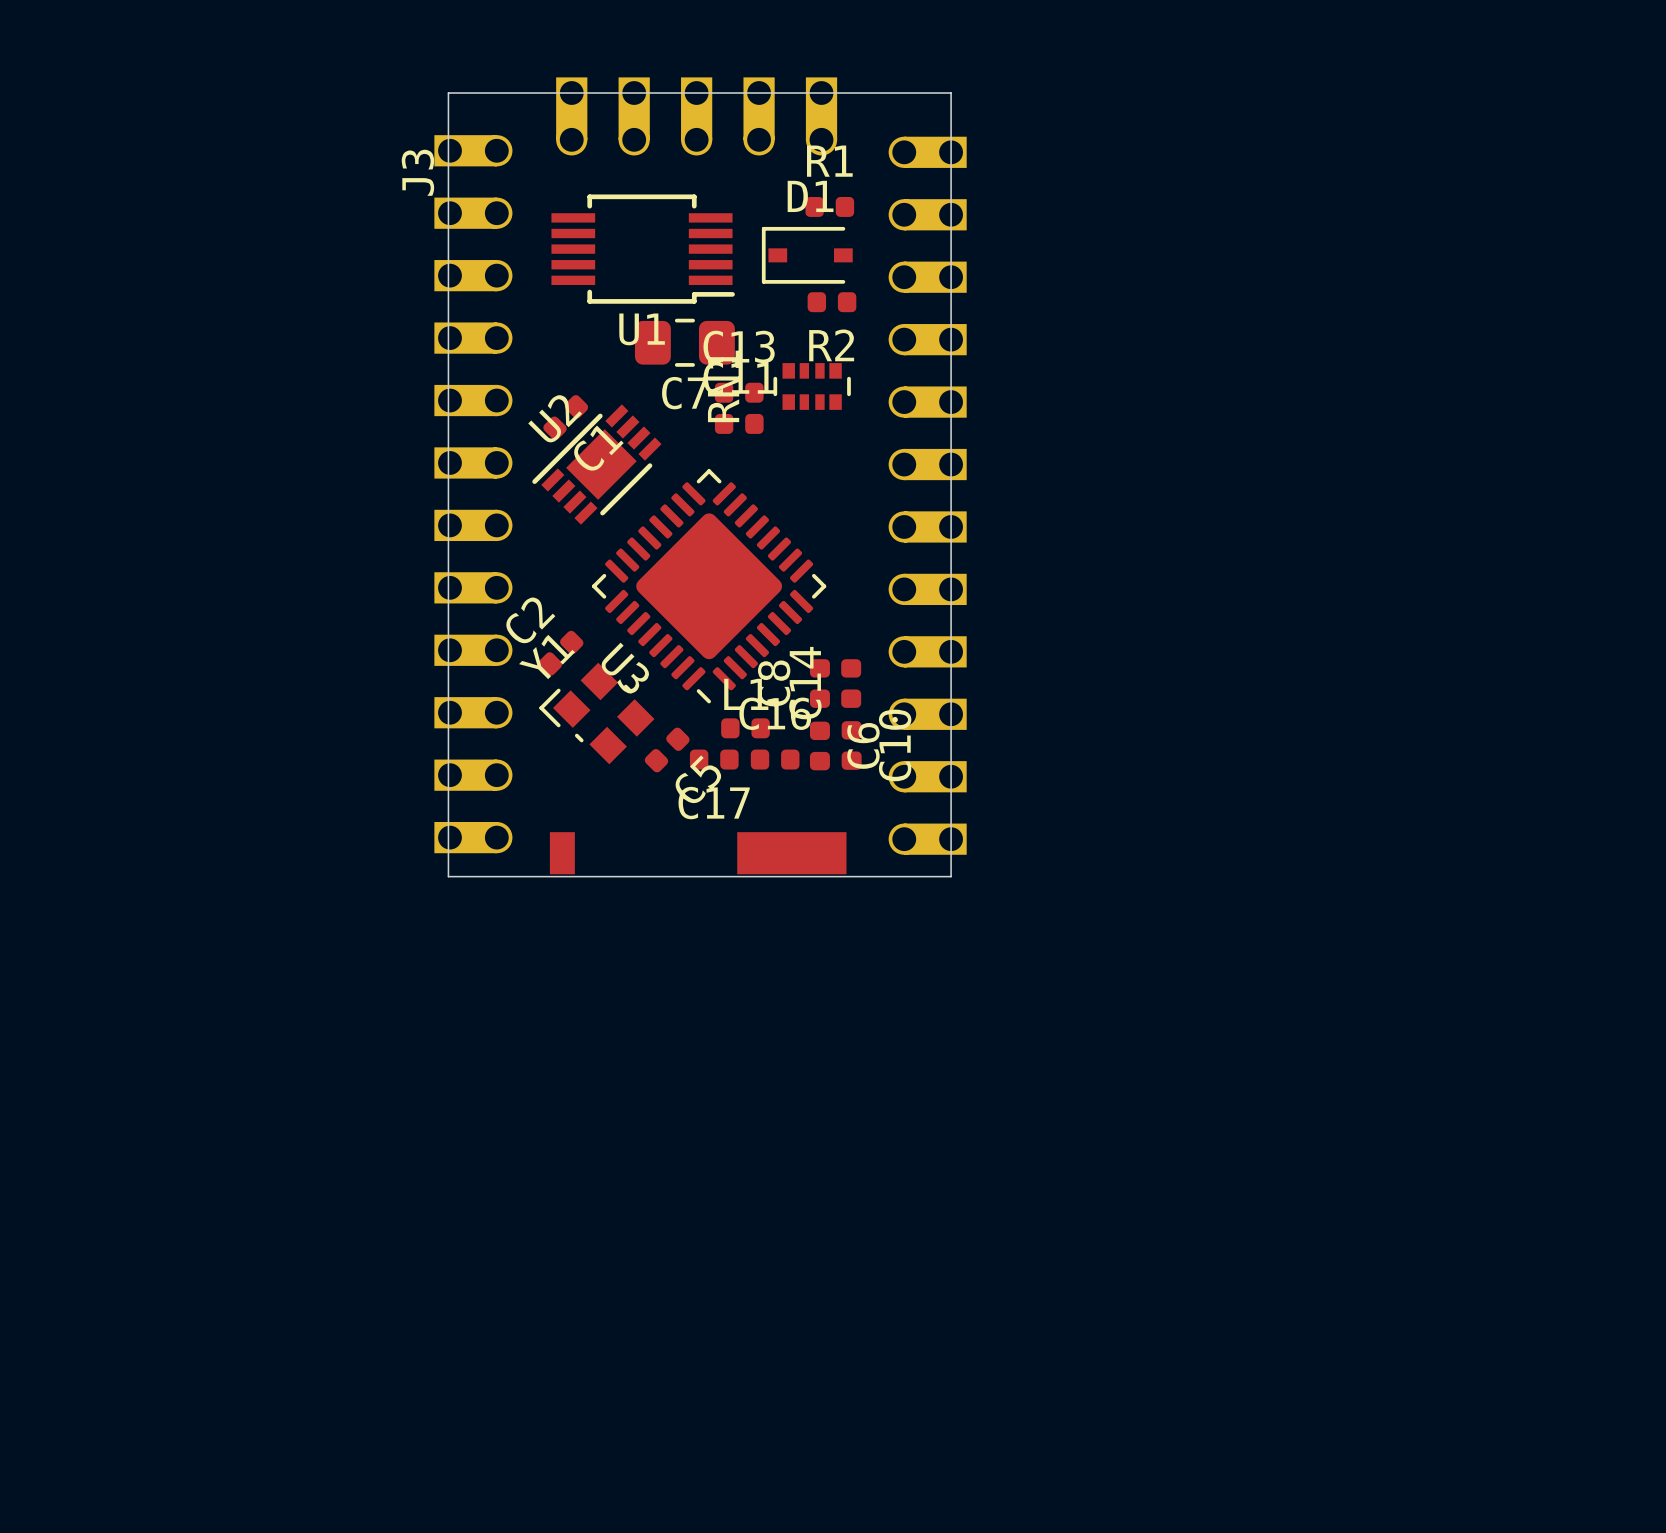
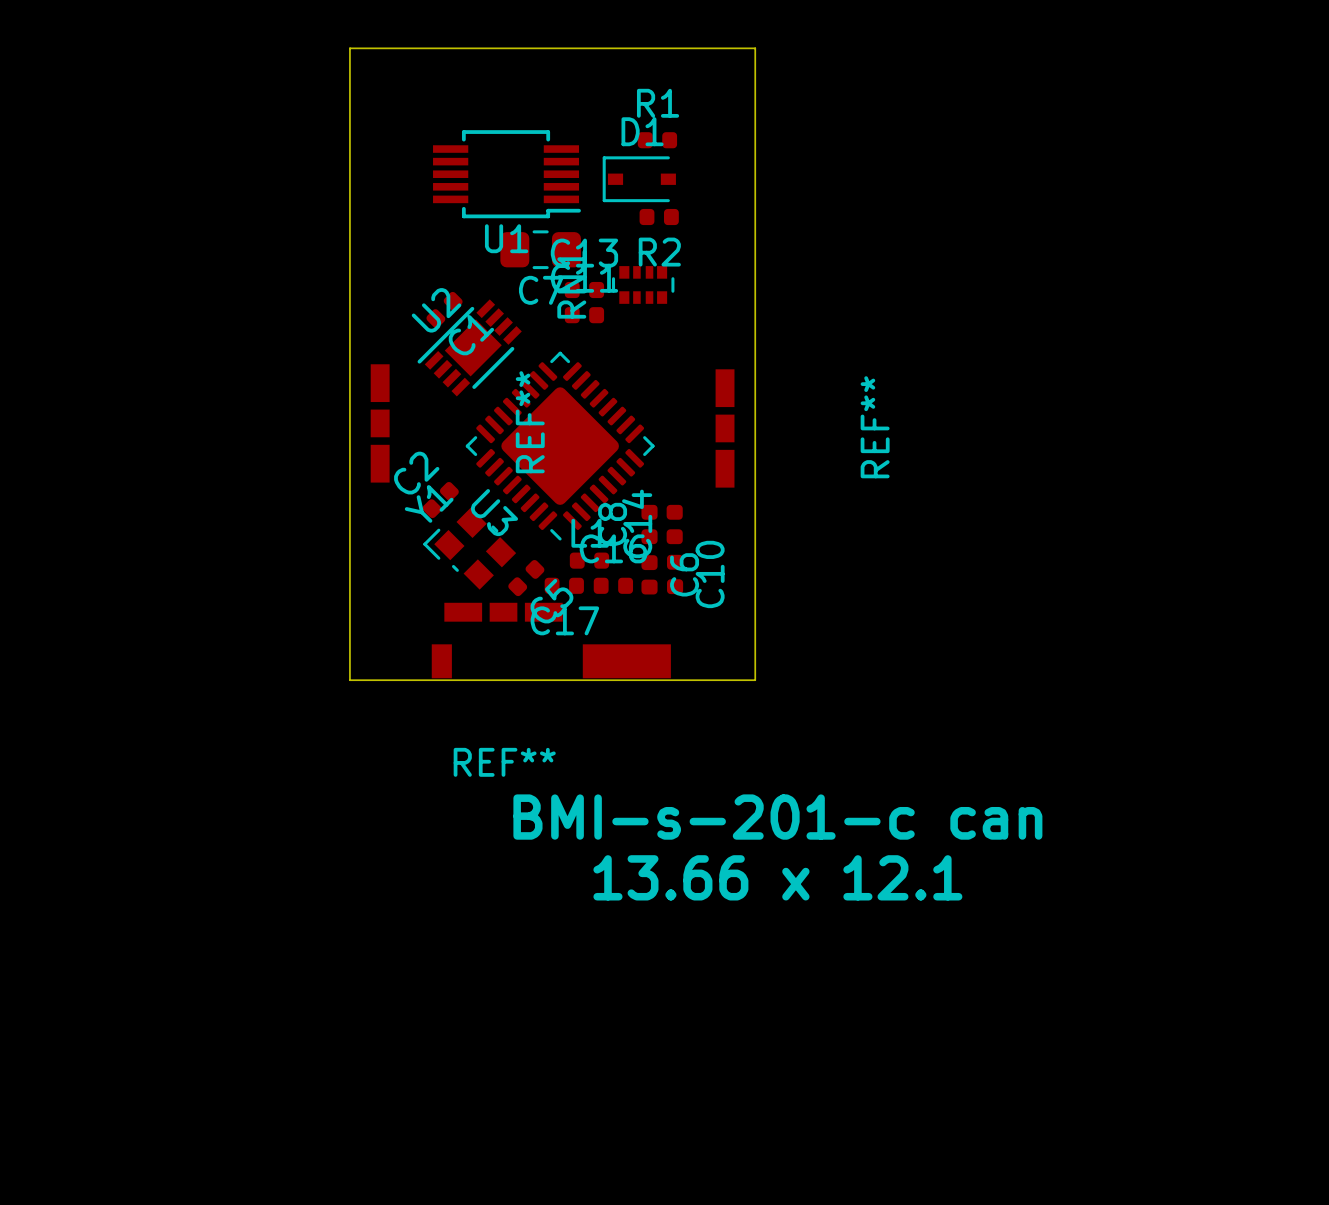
J3: (696, 116) -> none
part: (473, 494) -> none
part: (927, 495) -> none
REF**: none -> (380, 423)
REF**: none -> (725, 428)
REF**: none -> (503, 612)
text: none -> BMI-s-201-c can (777, 817)
text: none -> 13.66 x 12.1 (777, 877)

